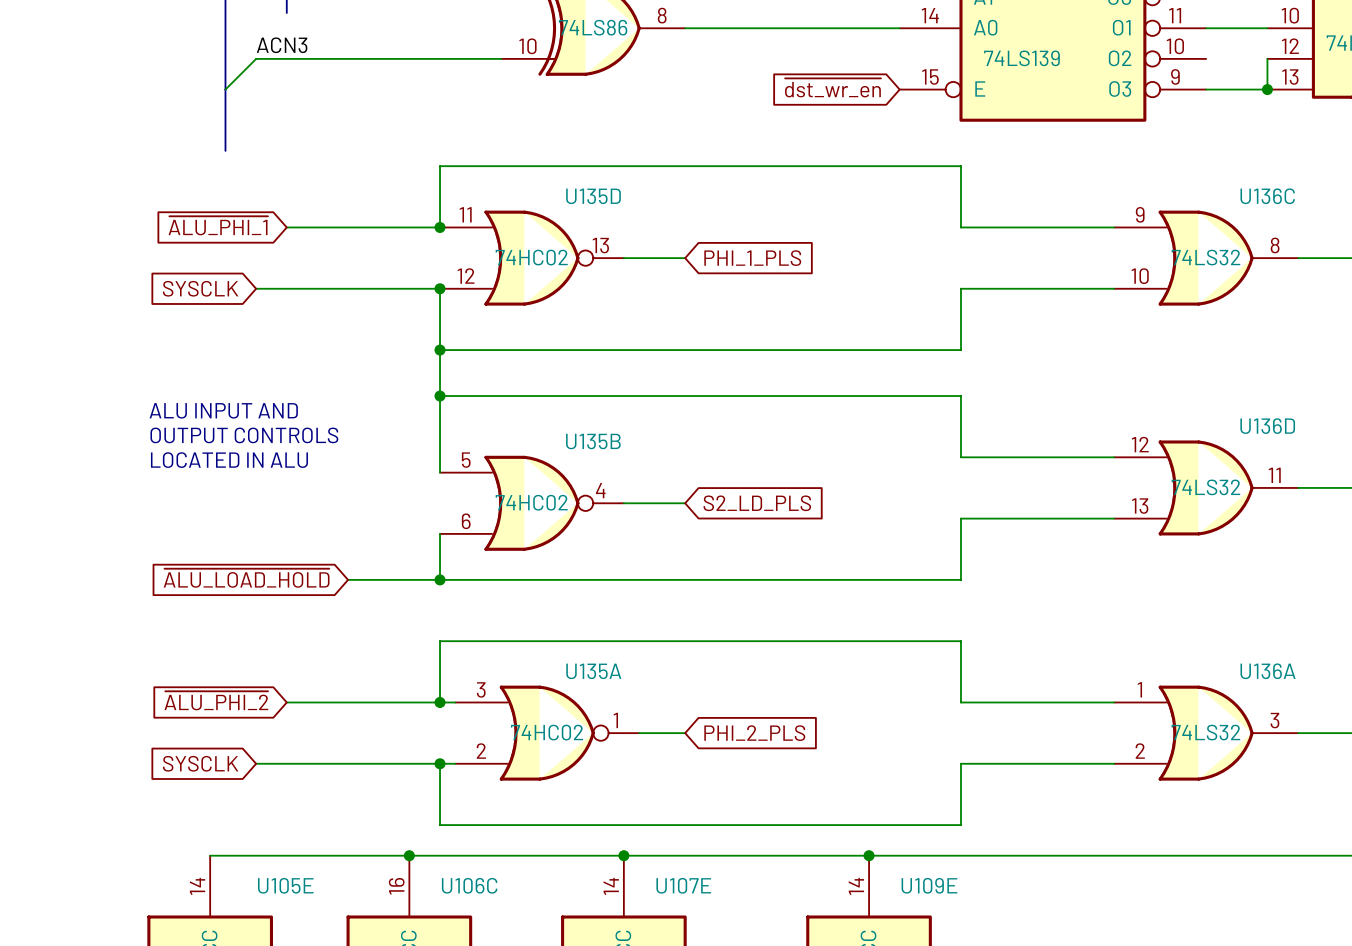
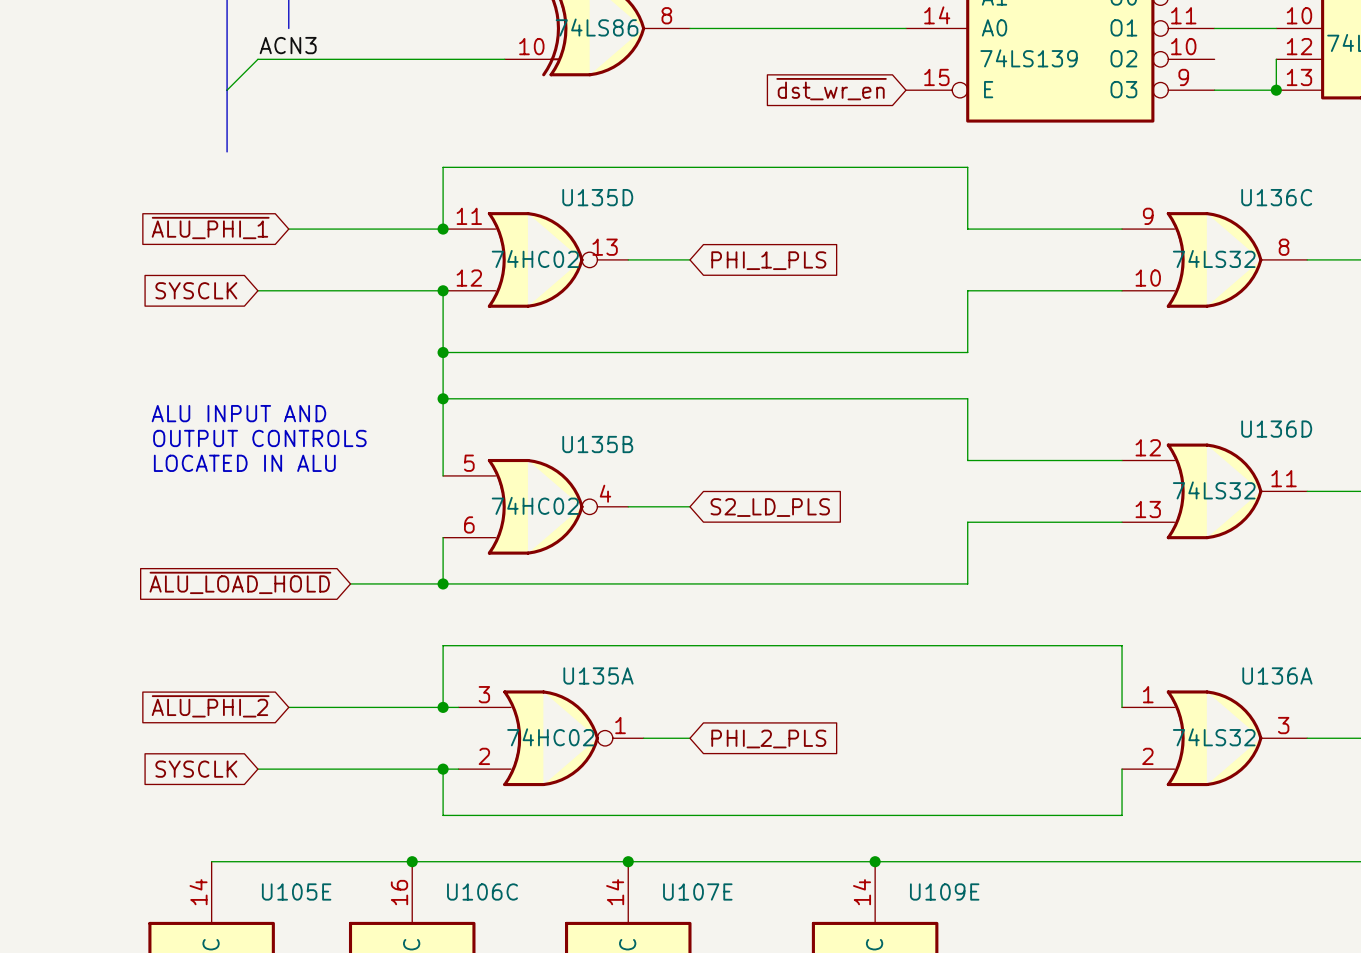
bus: none -> (288, 13) (288, 28)
wire: (960, 641) (960, 702) (1114, 702) -> (967, 645) (1122, 645) (1122, 707)
wire: (1114, 763) (960, 763) (960, 825) (440, 825) (440, 809) -> (1122, 769) (1122, 815) (443, 815)

